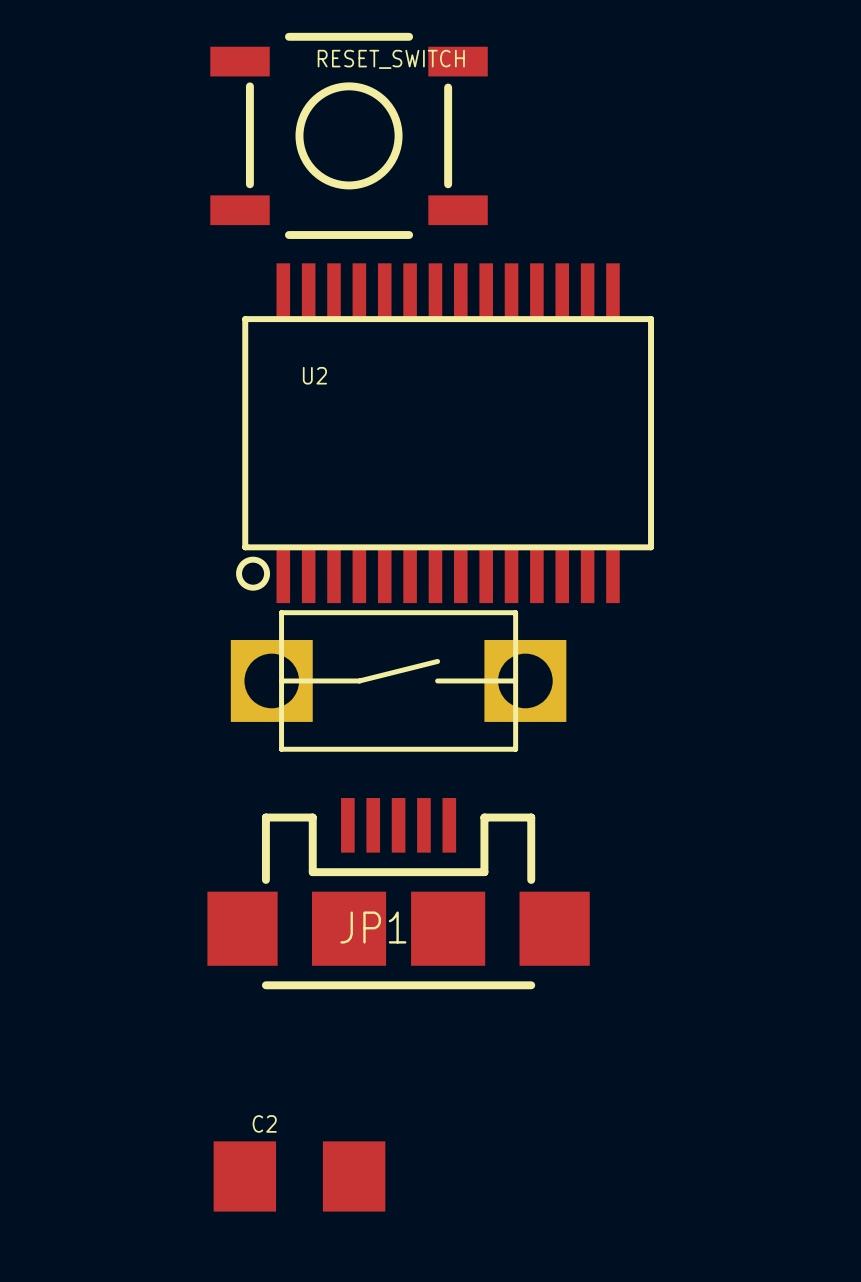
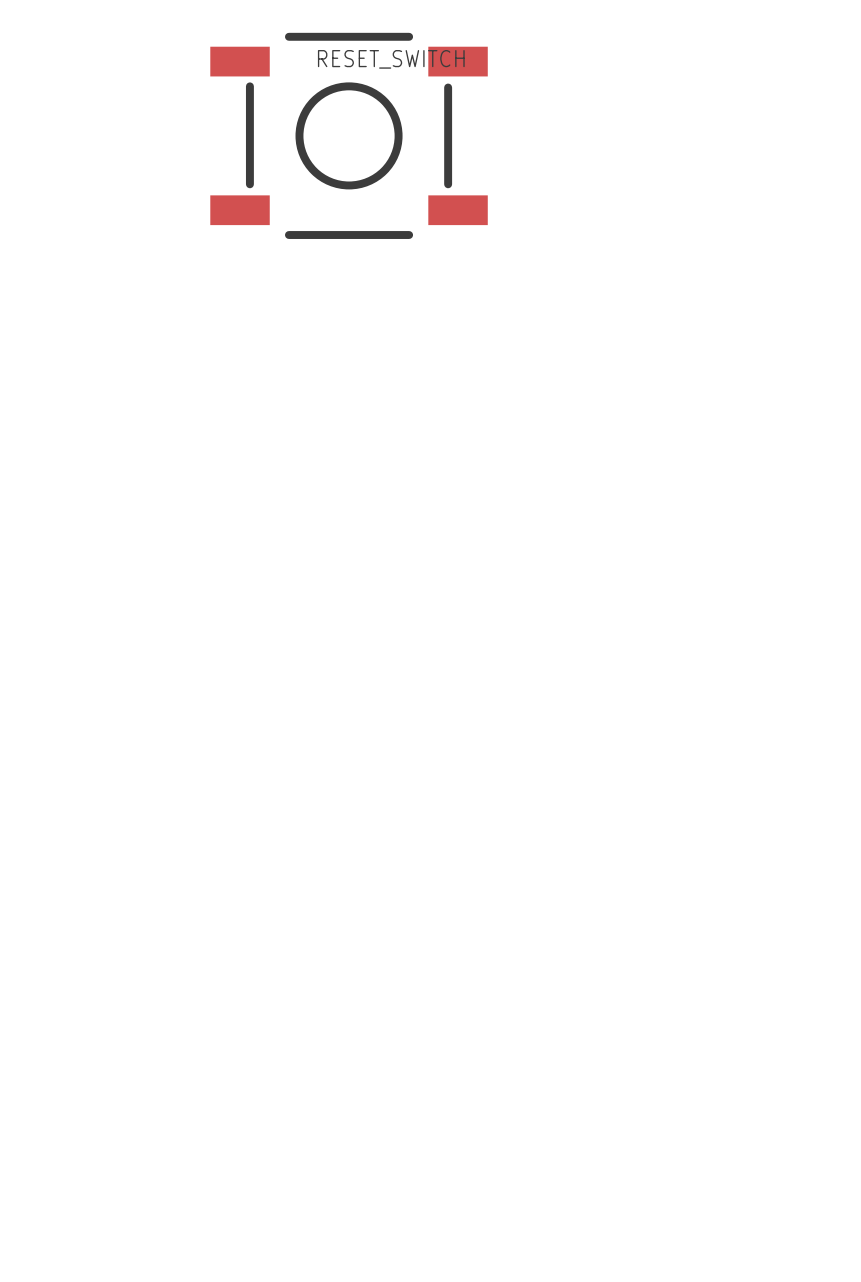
U2: (445, 433) -> none
part: (398, 680) -> none
JP1: (398, 893) -> none
C2: (299, 1176) -> none

